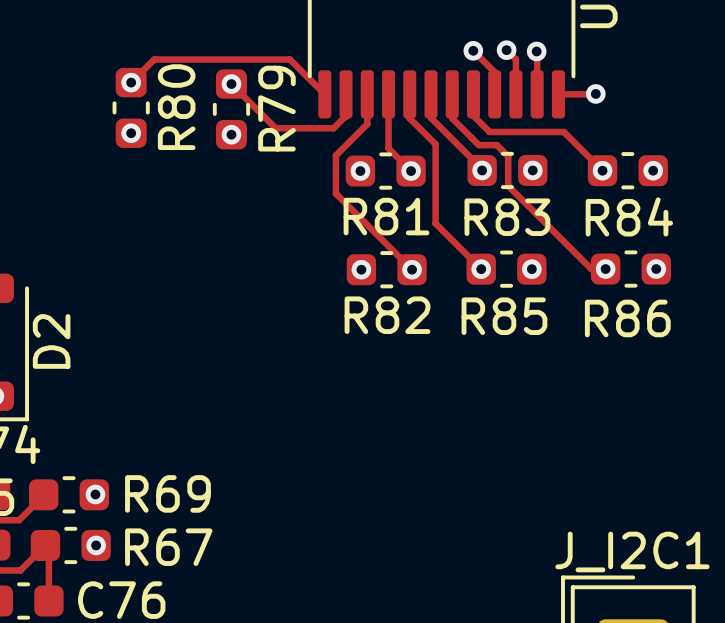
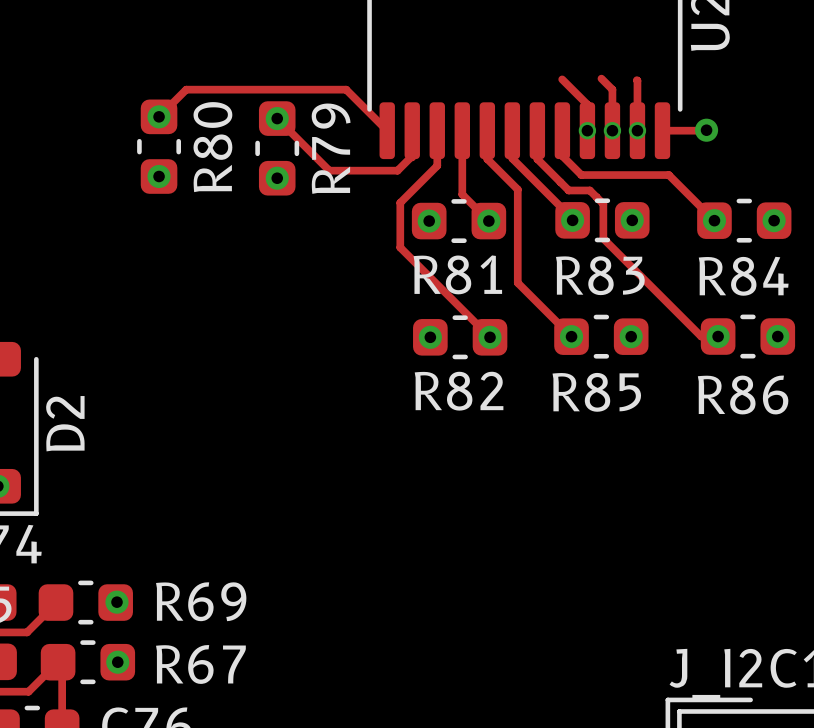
via: (473, 50) -> none
via: (506, 50) -> none
via: (536, 51) -> none
via: none -> (587, 130)
via: none -> (612, 130)
via: none -> (637, 130)

